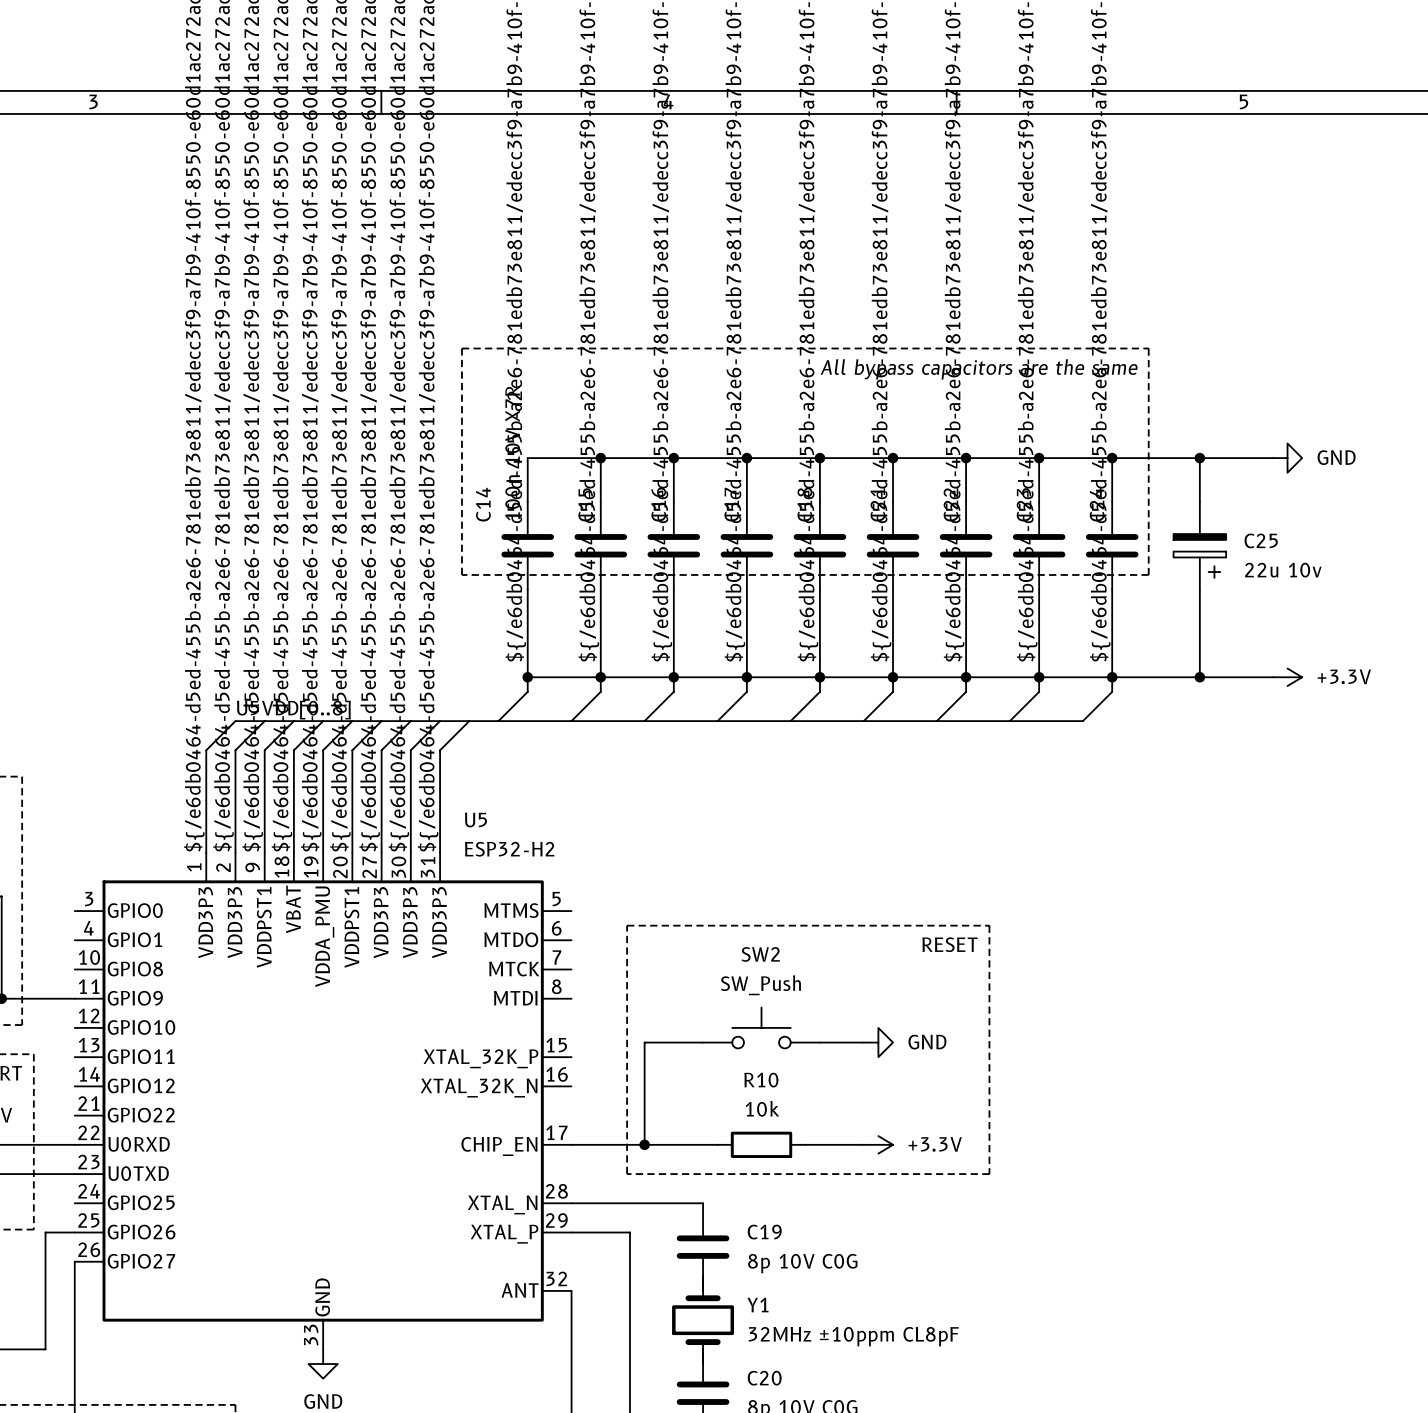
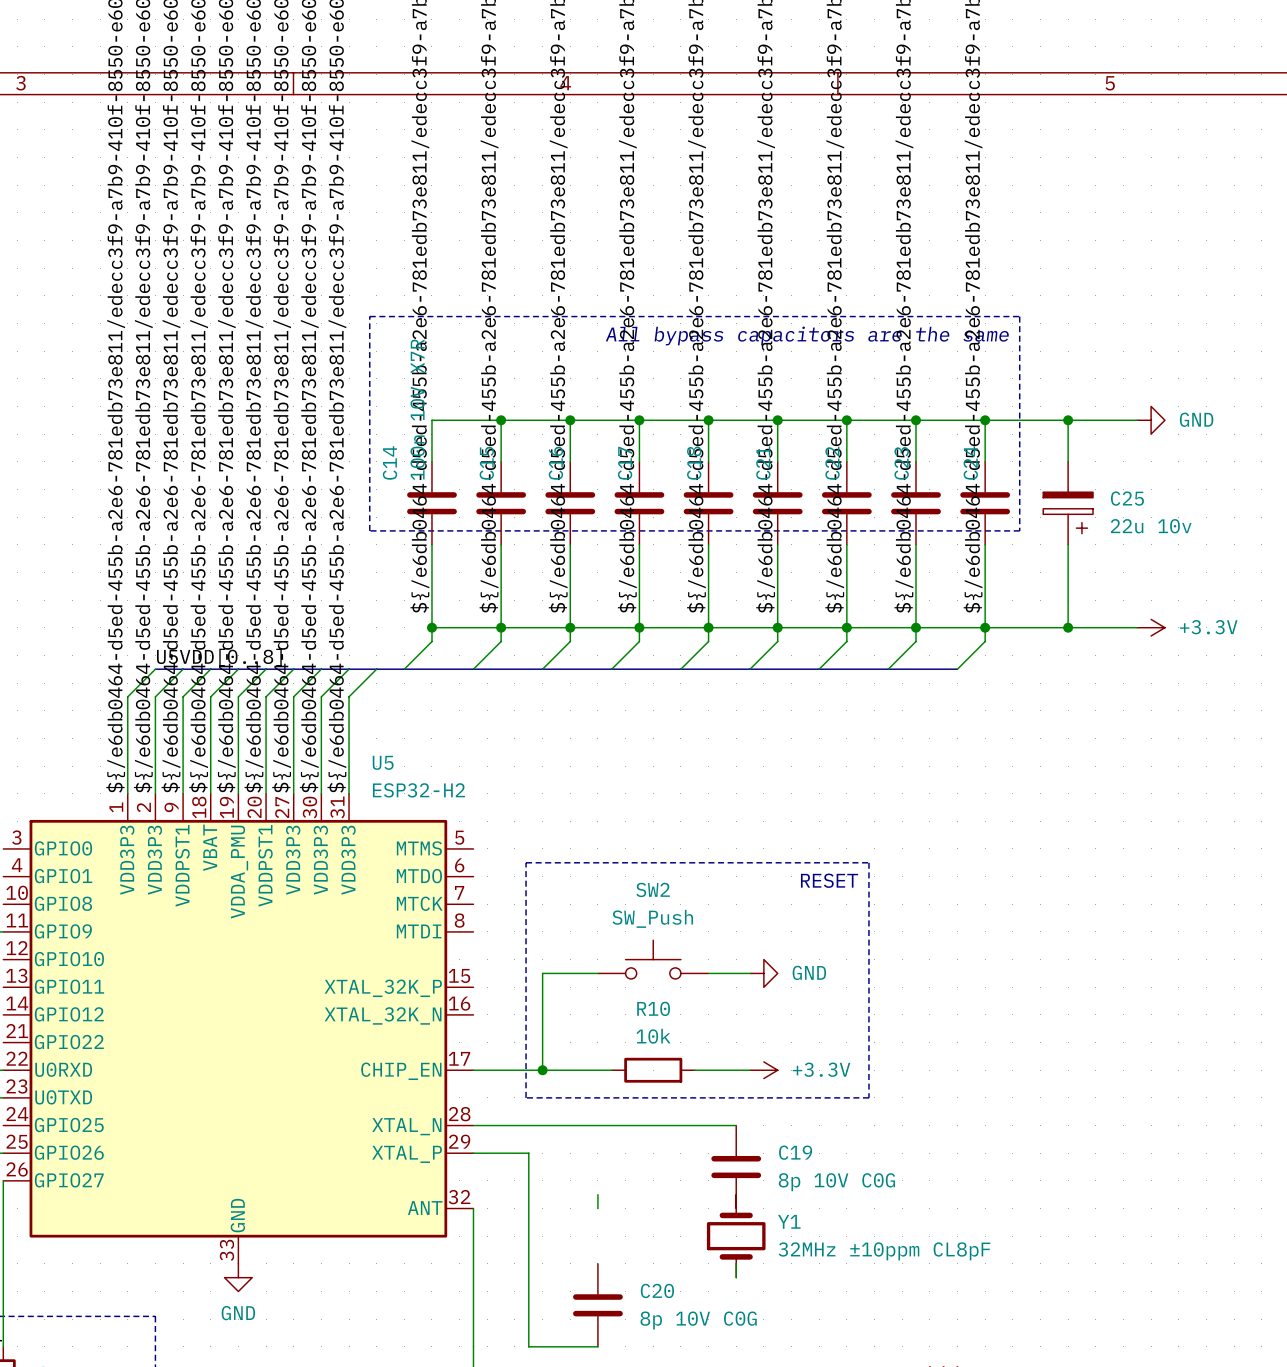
wire: none -> (597, 1125) (736, 1125)
C19 position: (703, 1247) -> (736, 1167)
Y1 position: (703, 1320) -> (736, 1236)

